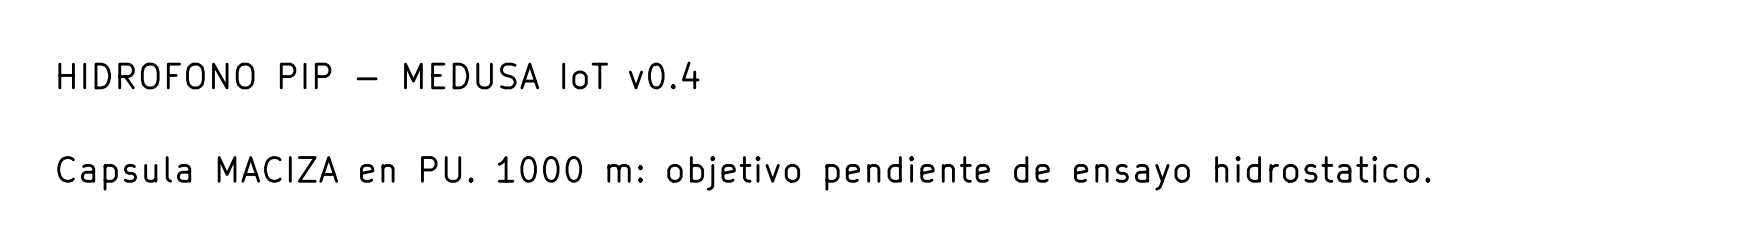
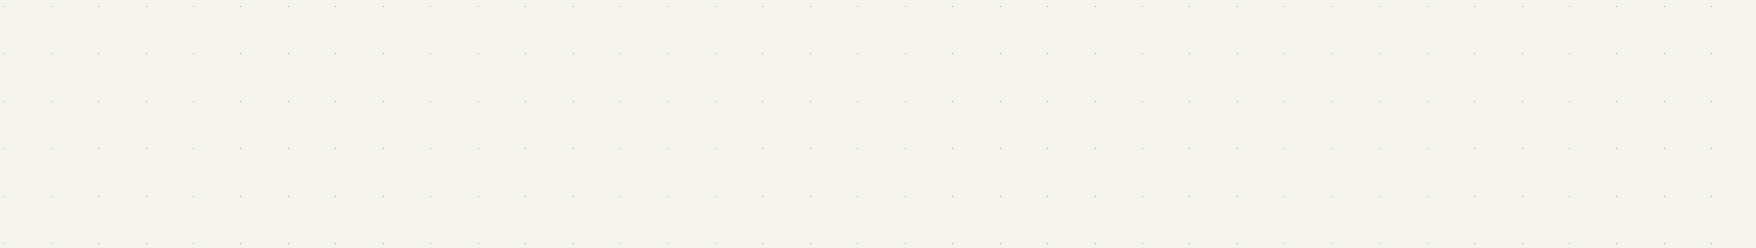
text: HIDROFONO PIP - MEDUSA IoT v0.4 (378, 75) -> none
text: Capsula MACIZA en PU. 1000 m: objetivo pendiente de ensayo hidrostatico. (743, 173) -> none

